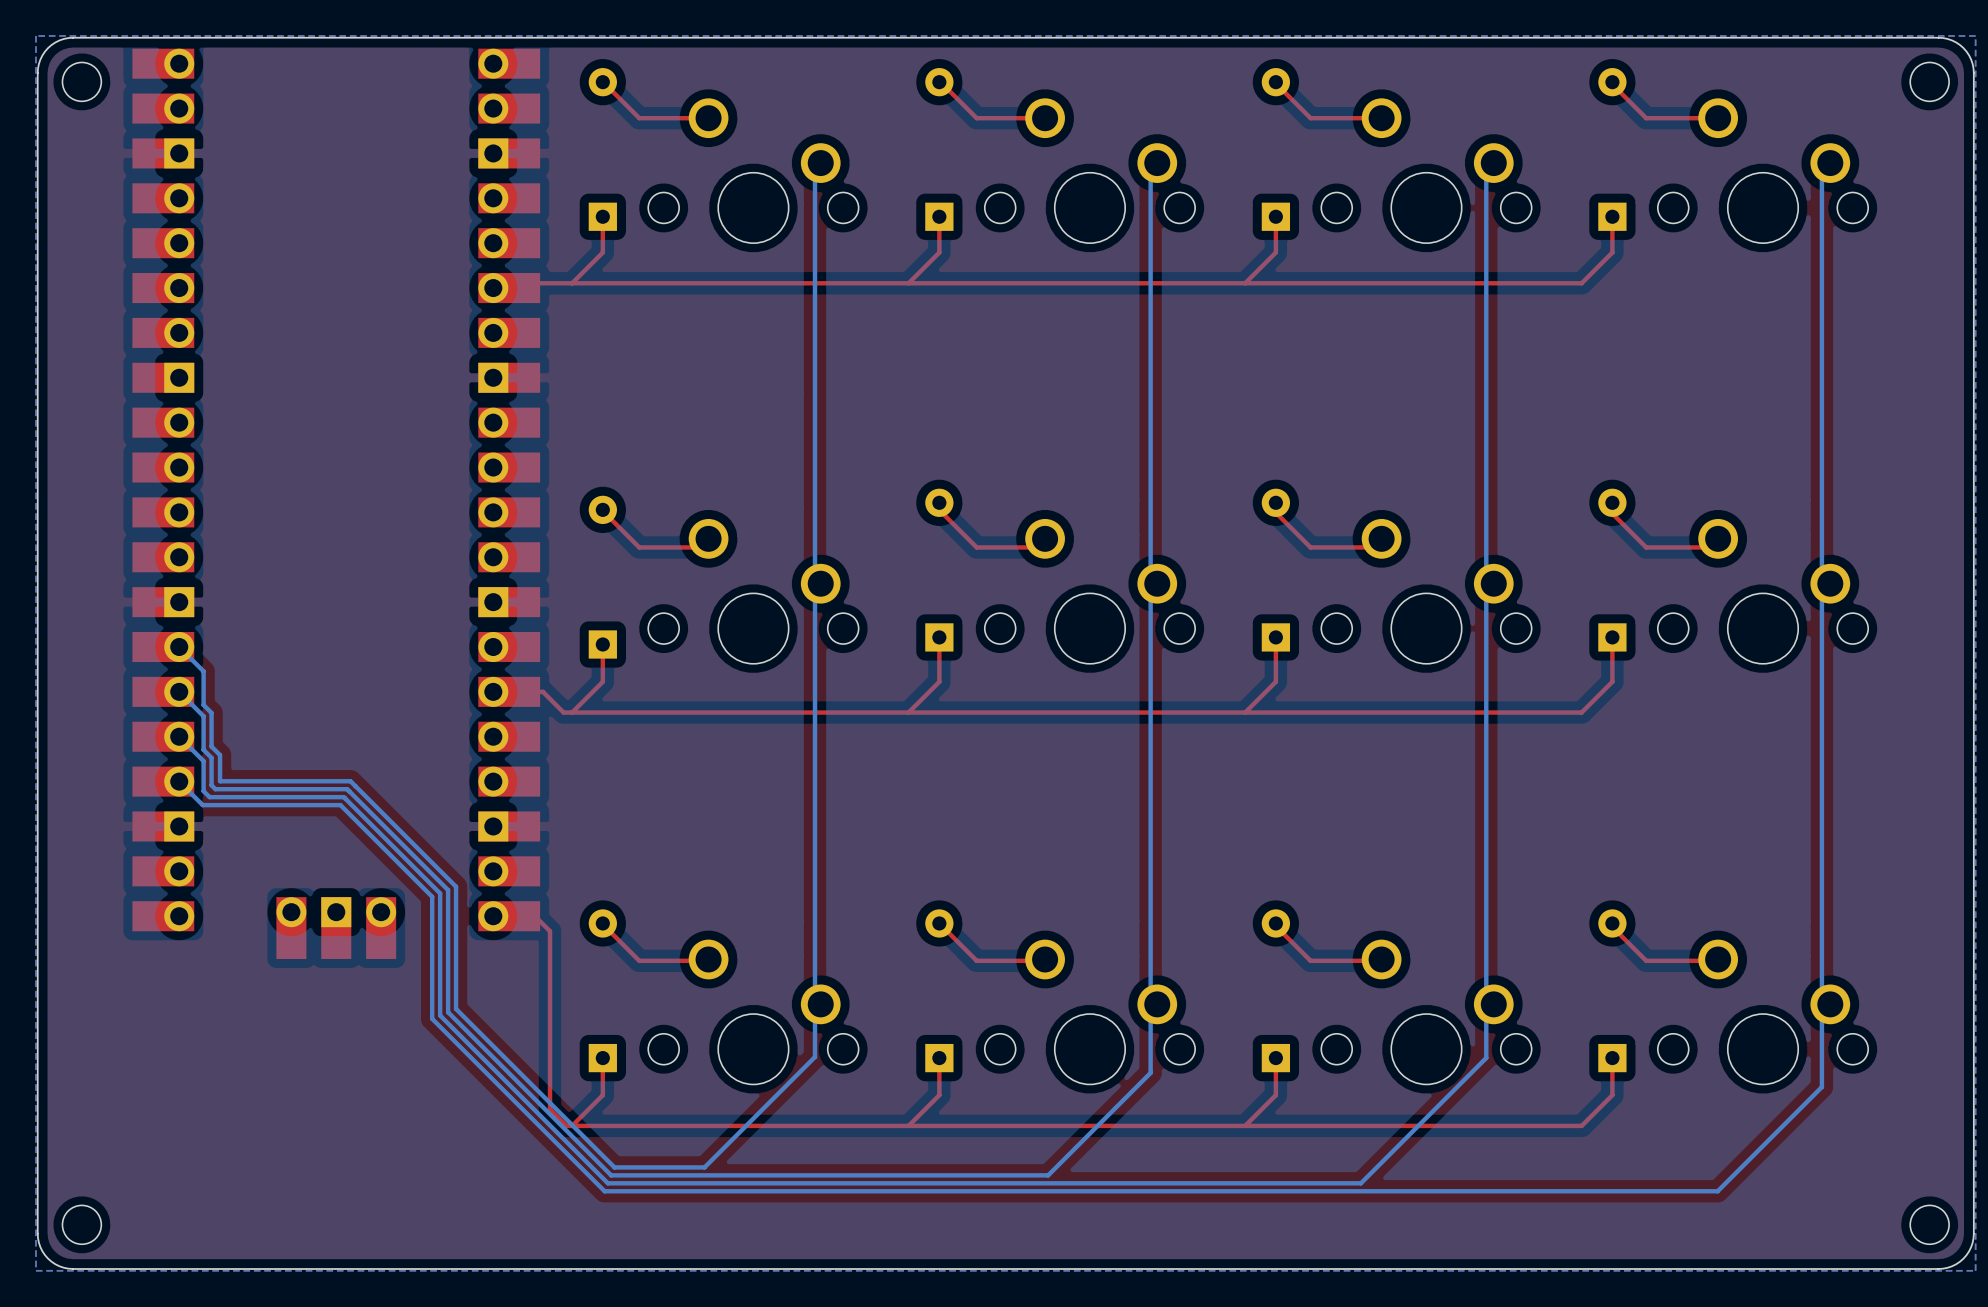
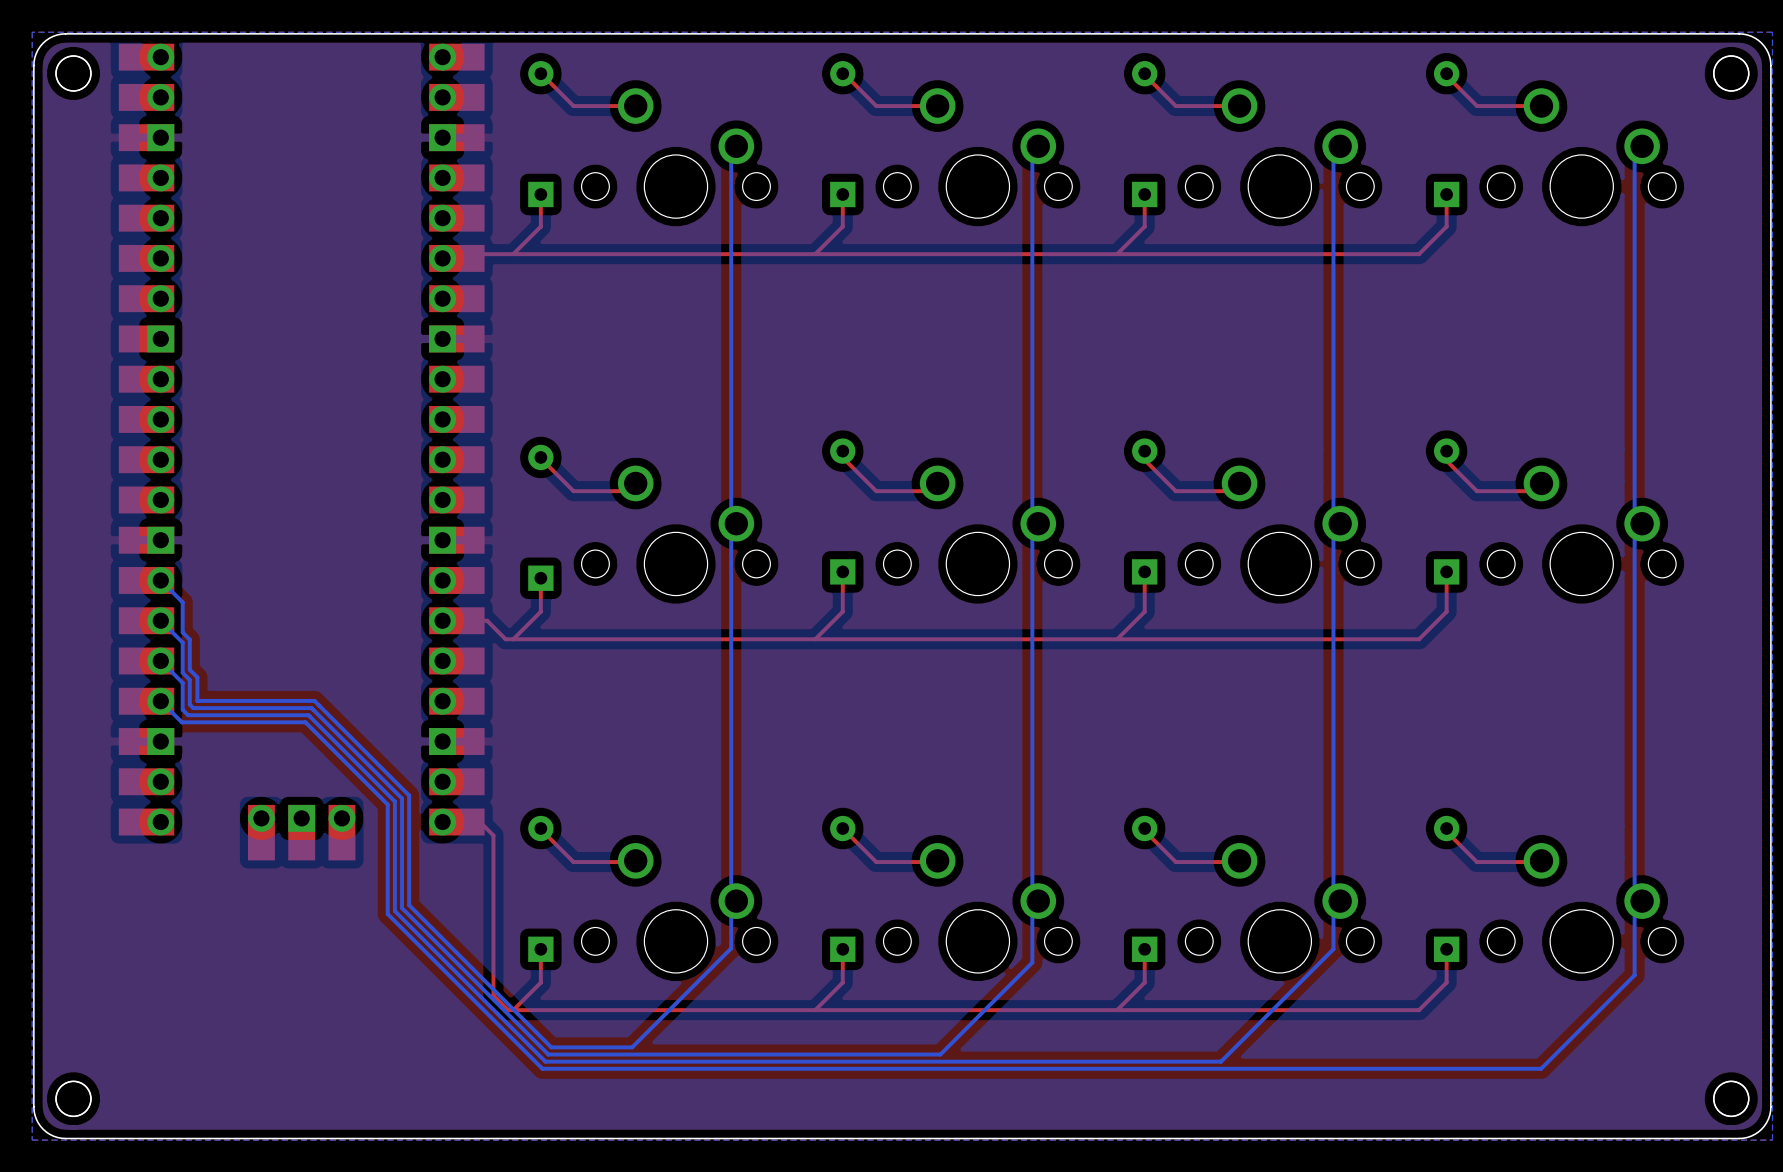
round board edge: none -> [55, 55, 92, 92]
round board edge: none -> [1712, 55, 1750, 92]
round board edge: none -> [55, 1080, 92, 1118]
round board edge: none -> [1712, 1080, 1750, 1118]

